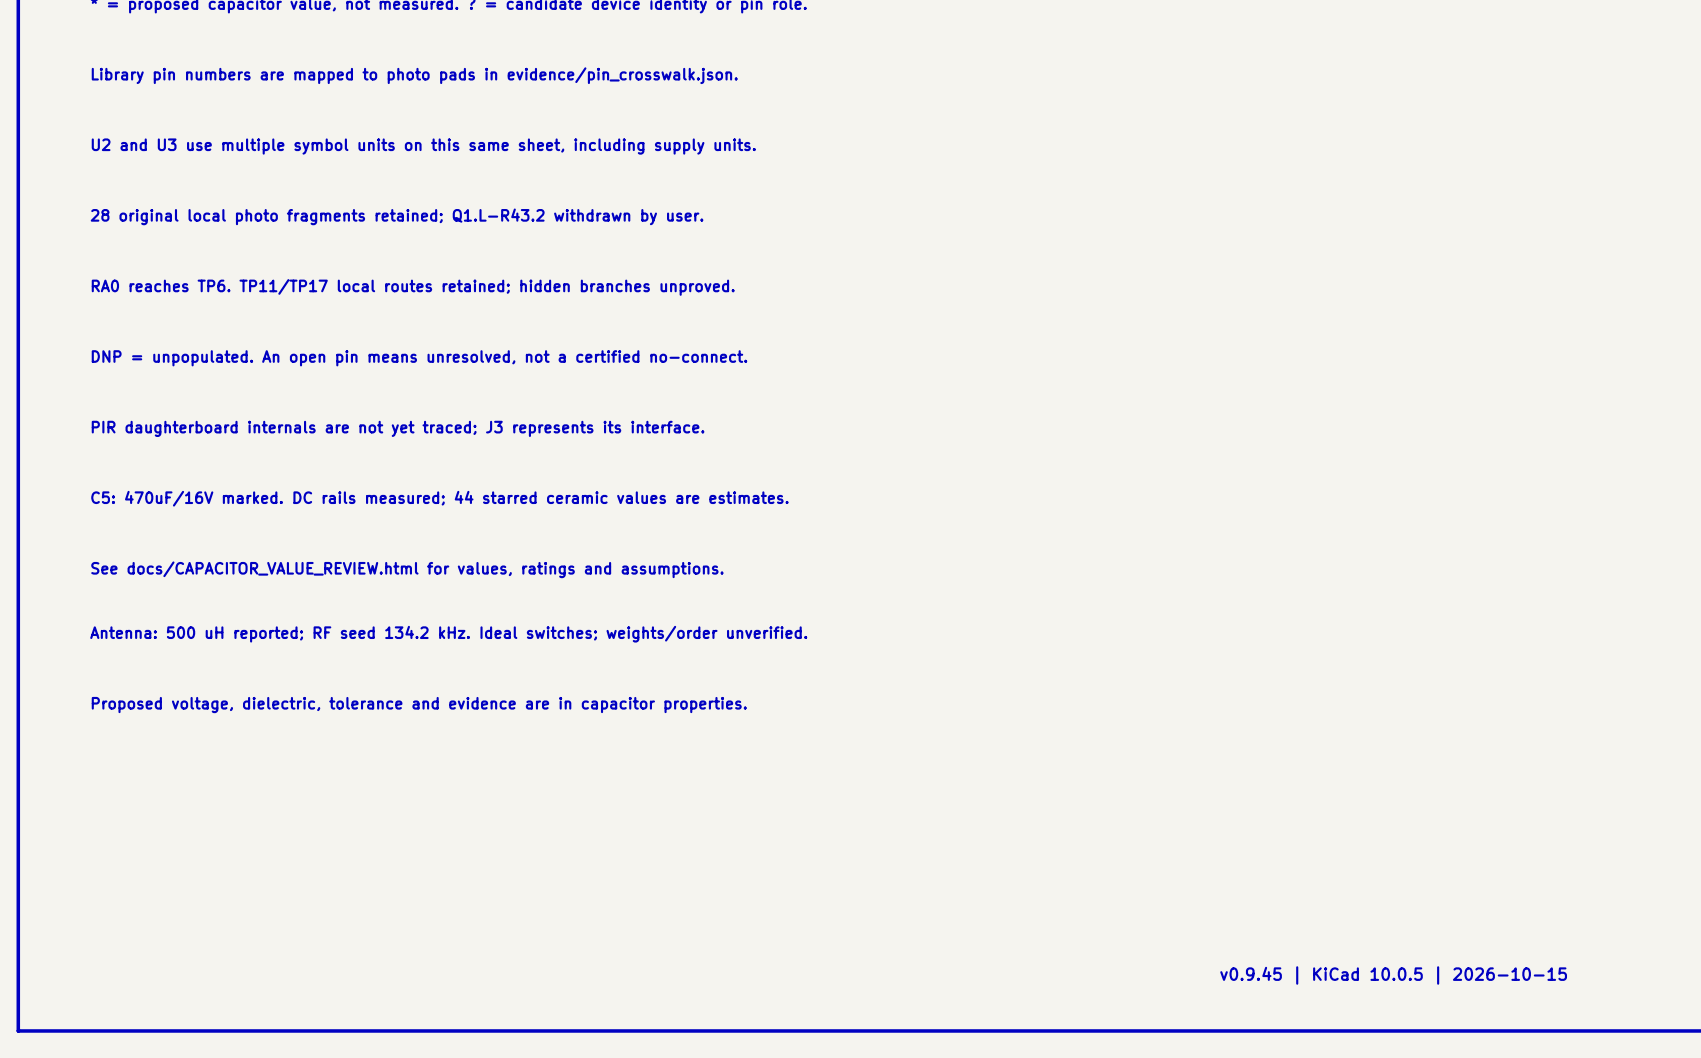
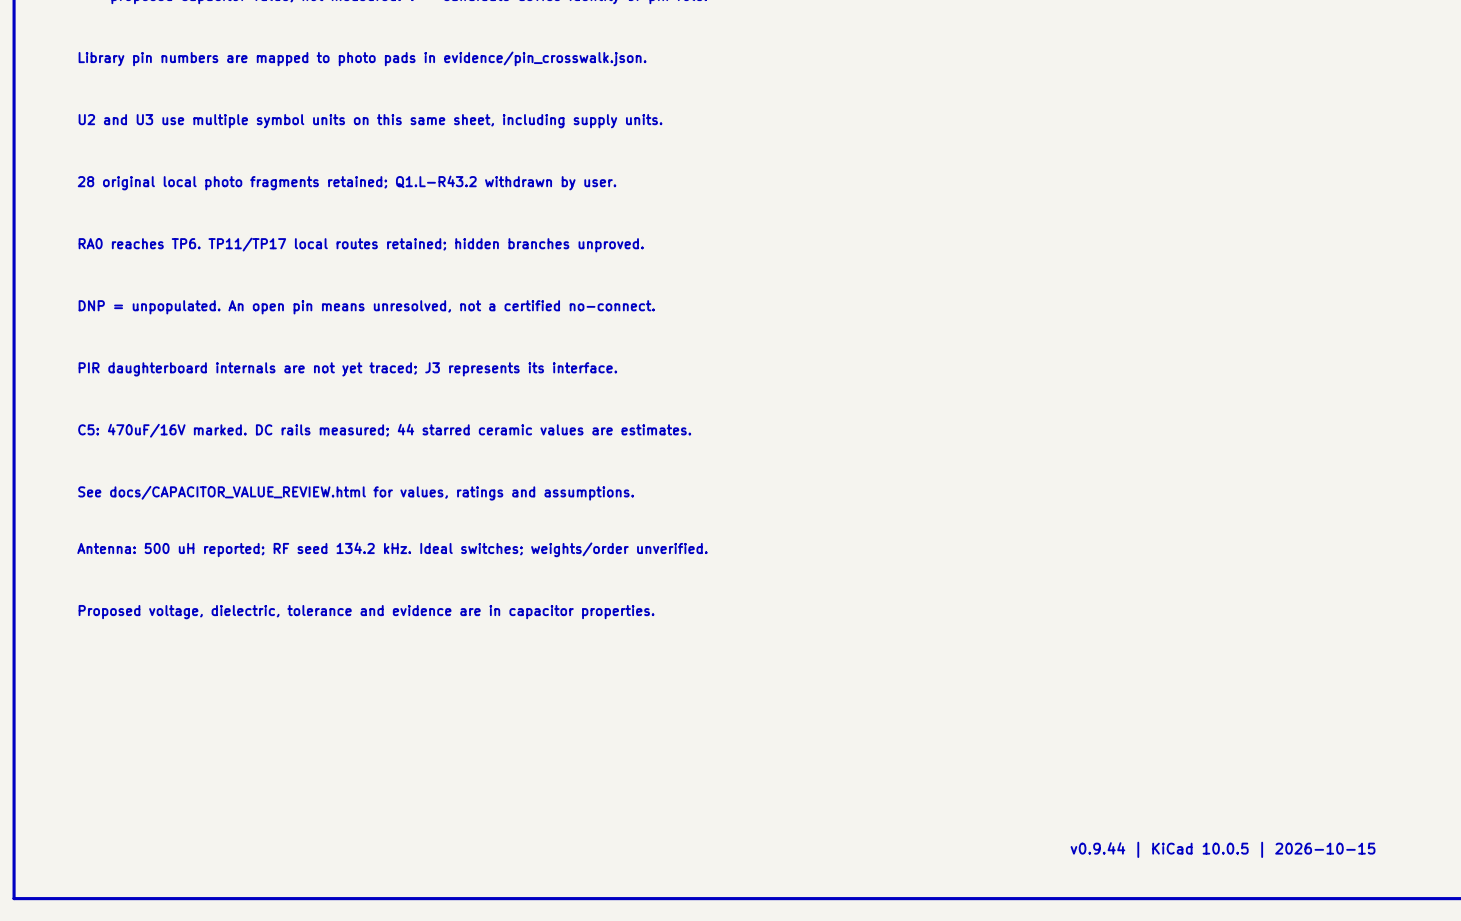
text: v0.9.45 | KiCad 10.0.5 | 2026-10-15 (1393, 975) -> v0.9.44 | KiCad 10.0.5 | 2026-10-15 (1223, 849)

